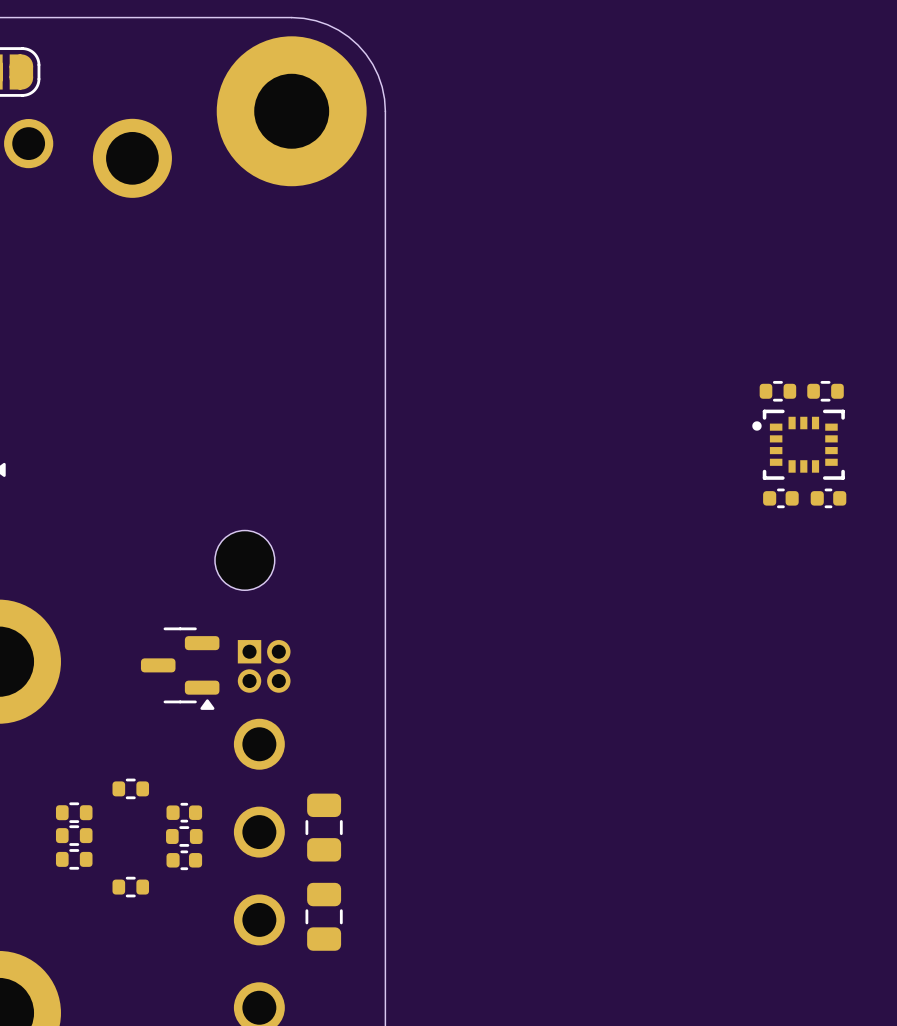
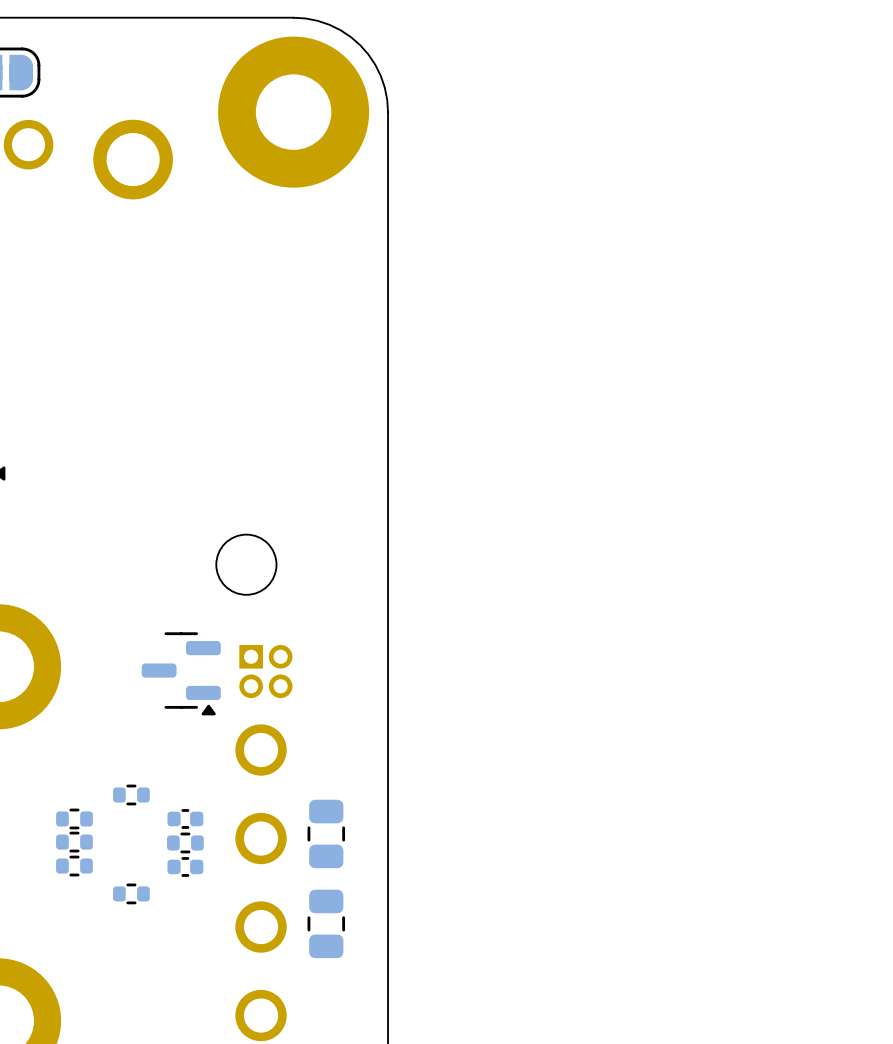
part: (777, 391) -> none
part: (825, 391) -> none
part: (798, 444) -> none
part: (780, 498) -> none
part: (828, 498) -> none

